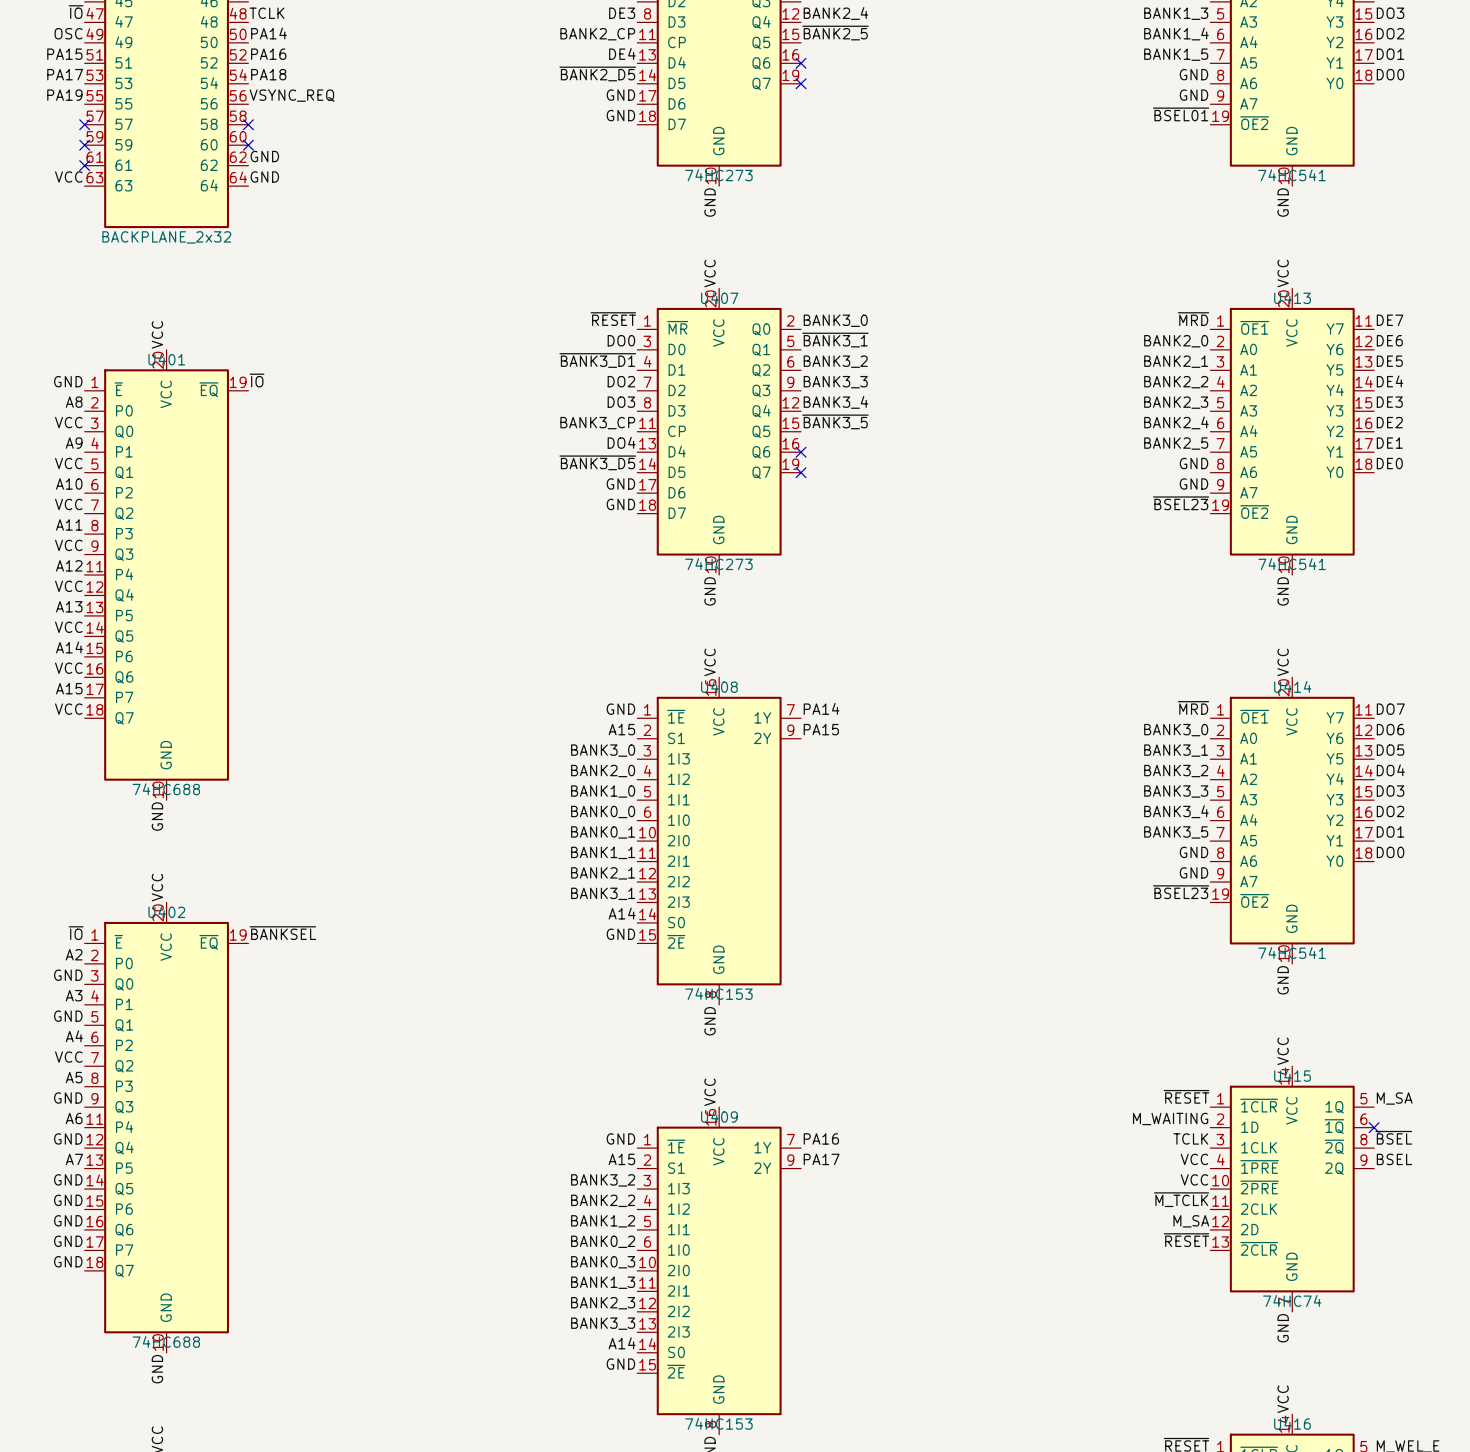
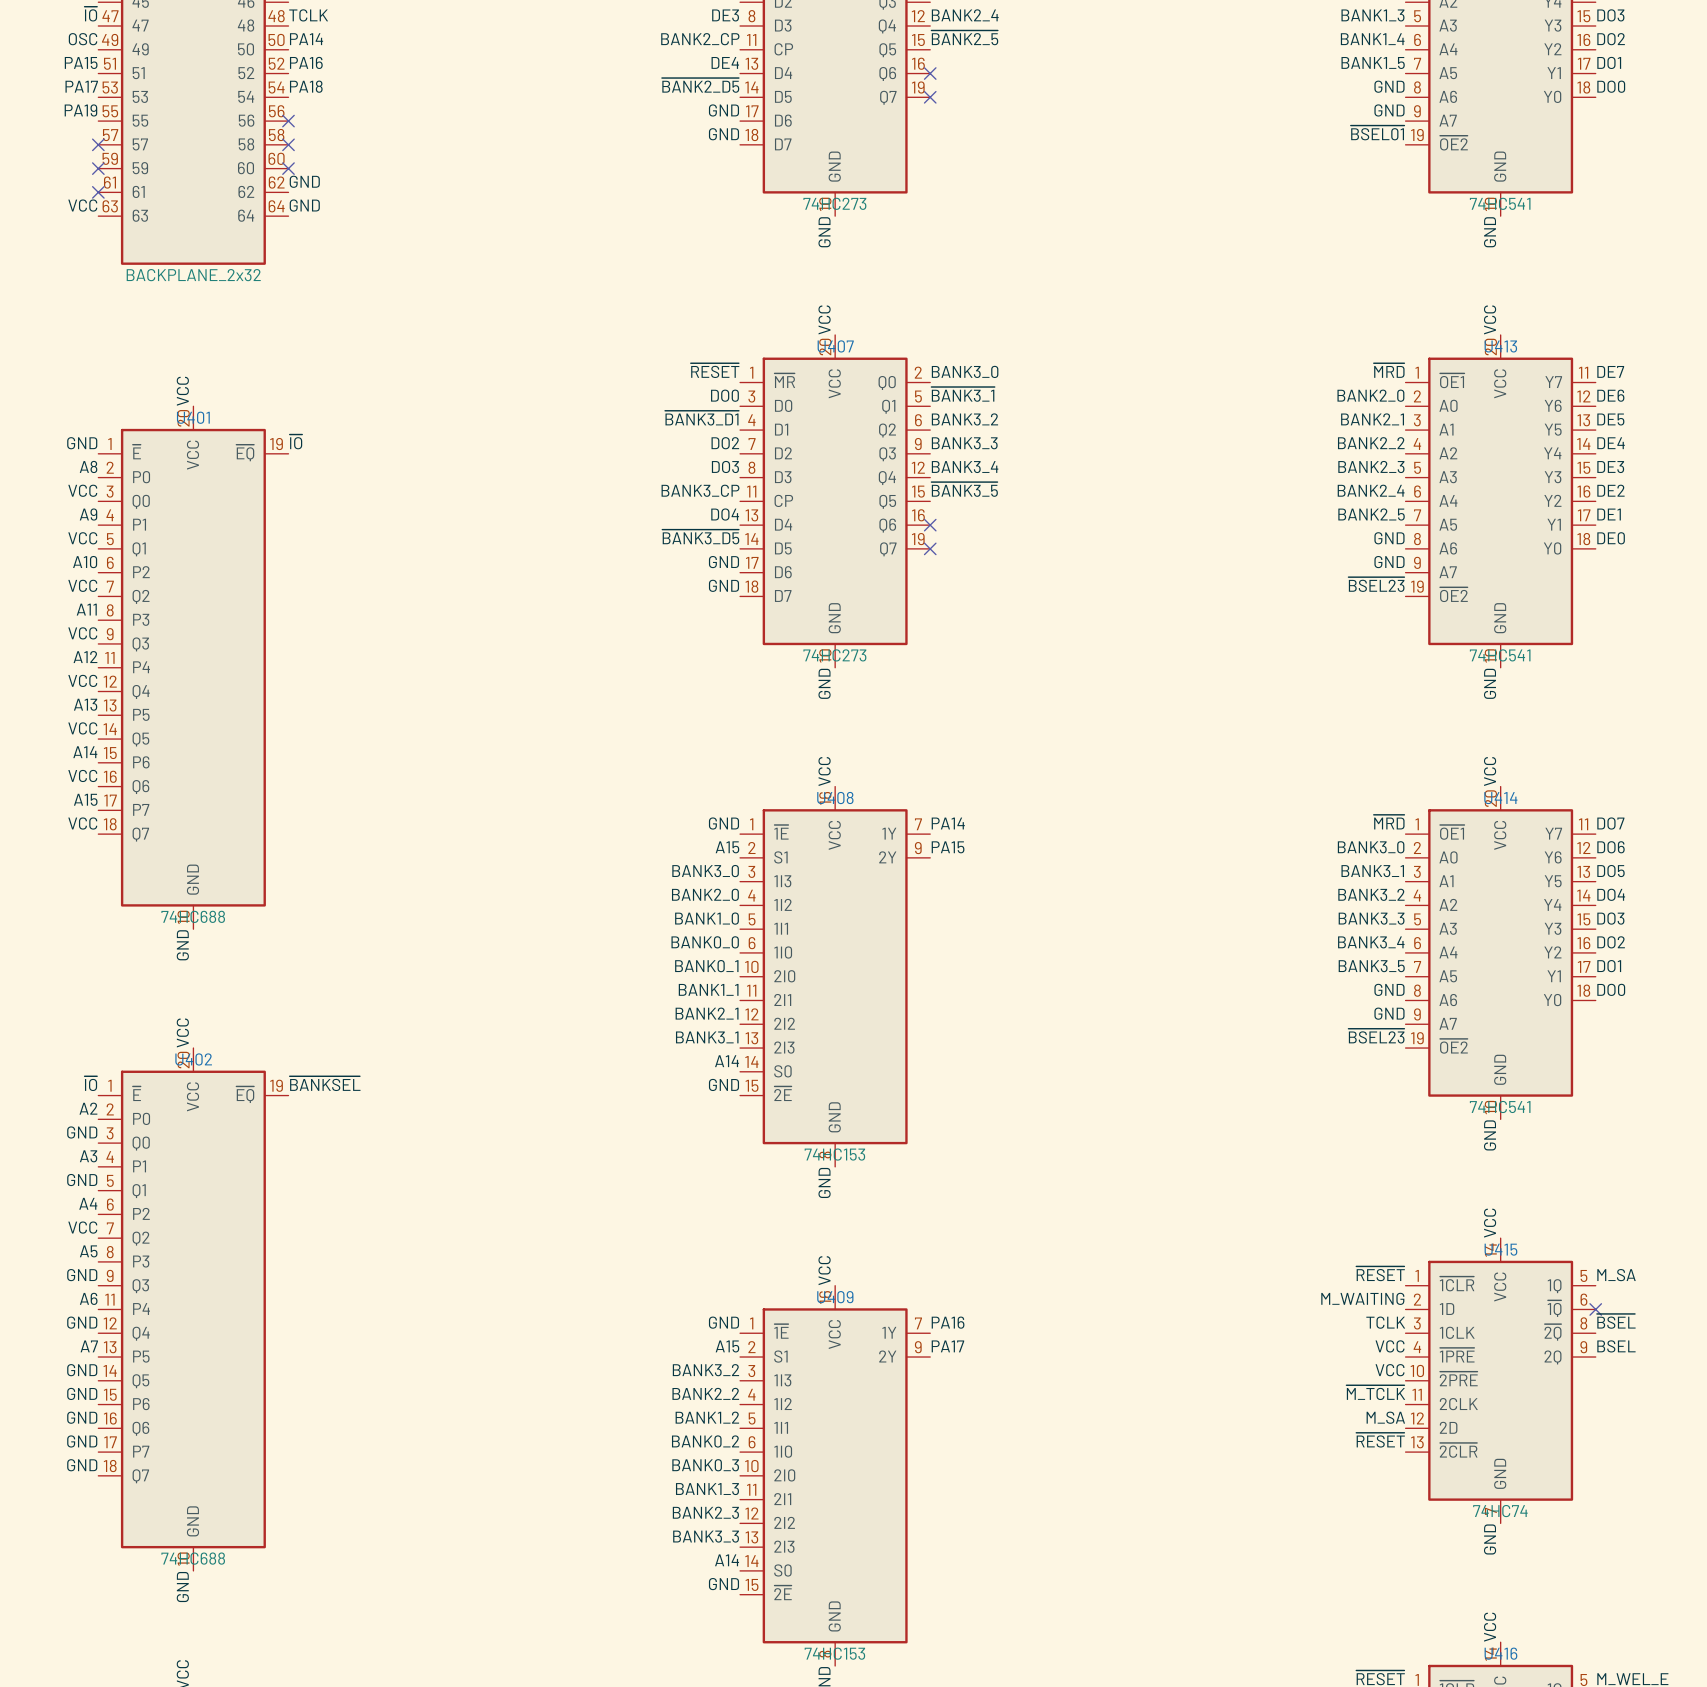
label: VSYNC_REQ (292, 95) -> none
no-connect mark: none -> (288, 121)

